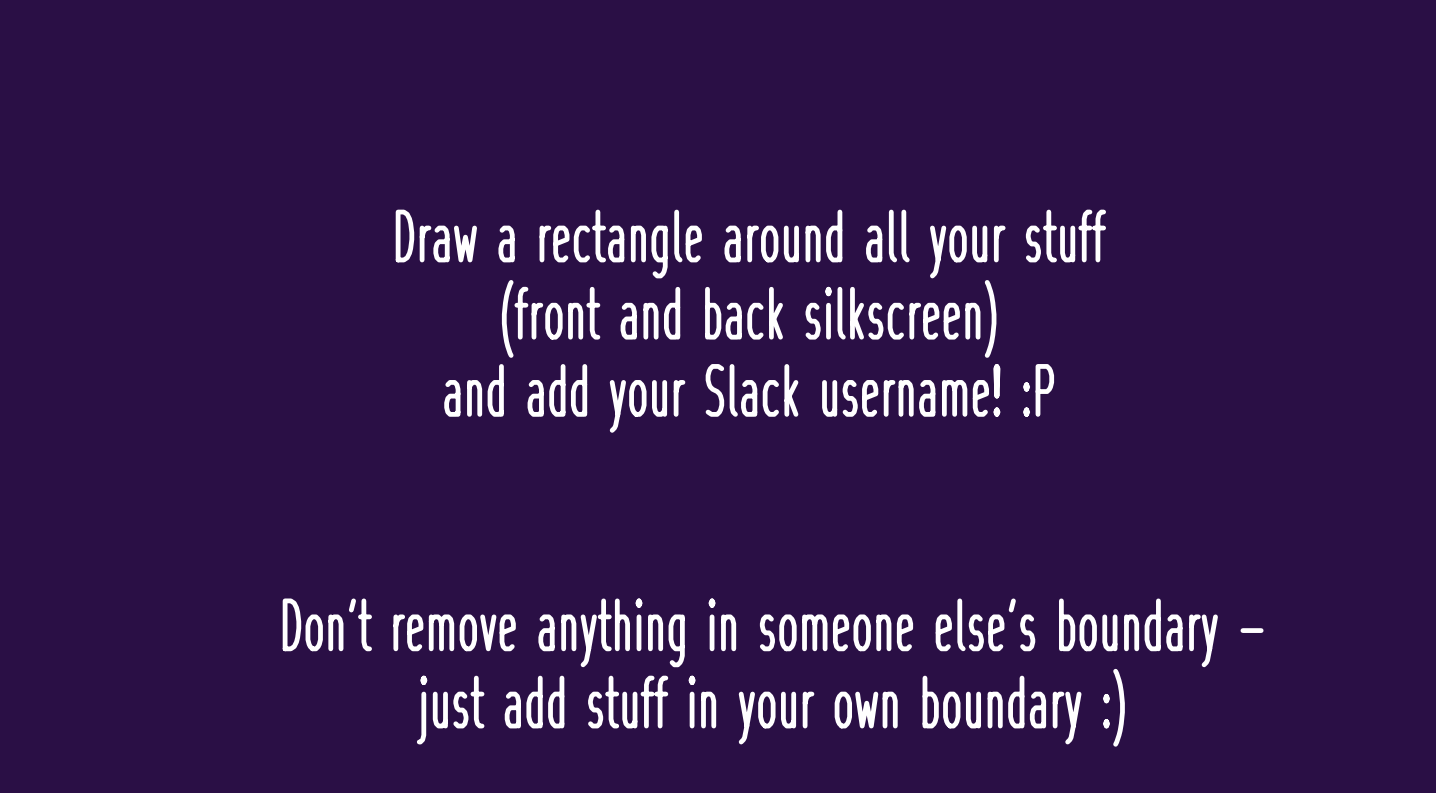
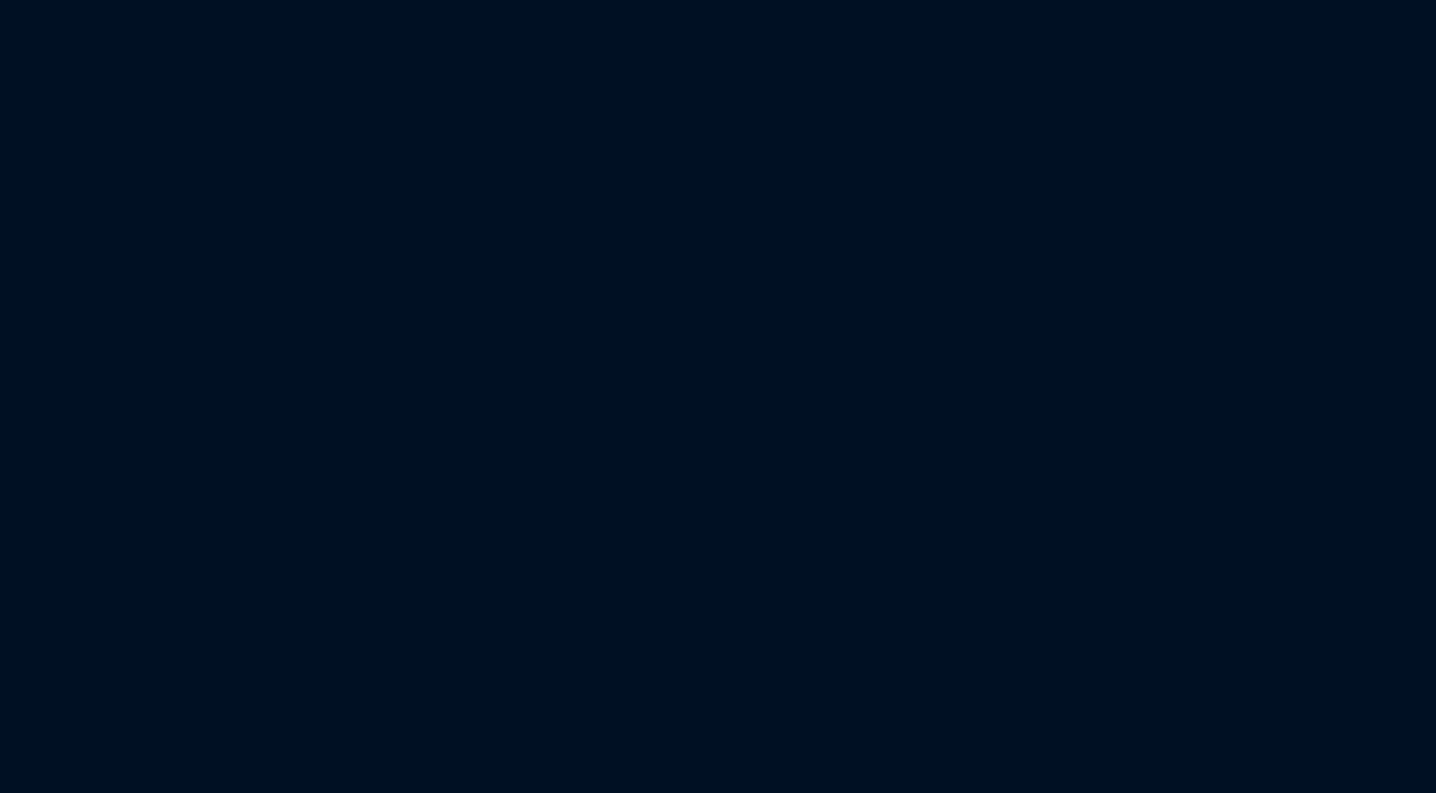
text: Draw a rectangle around all your stuff (750, 244) -> none
text: (front and back silkscreen) (749, 318) -> none
text: and add your Slack username! :P (749, 398) -> none
text: Don't remove anything in someone else's boundary - (773, 632) -> none
text: just add stuff in your own boundary :) (770, 707) -> none

